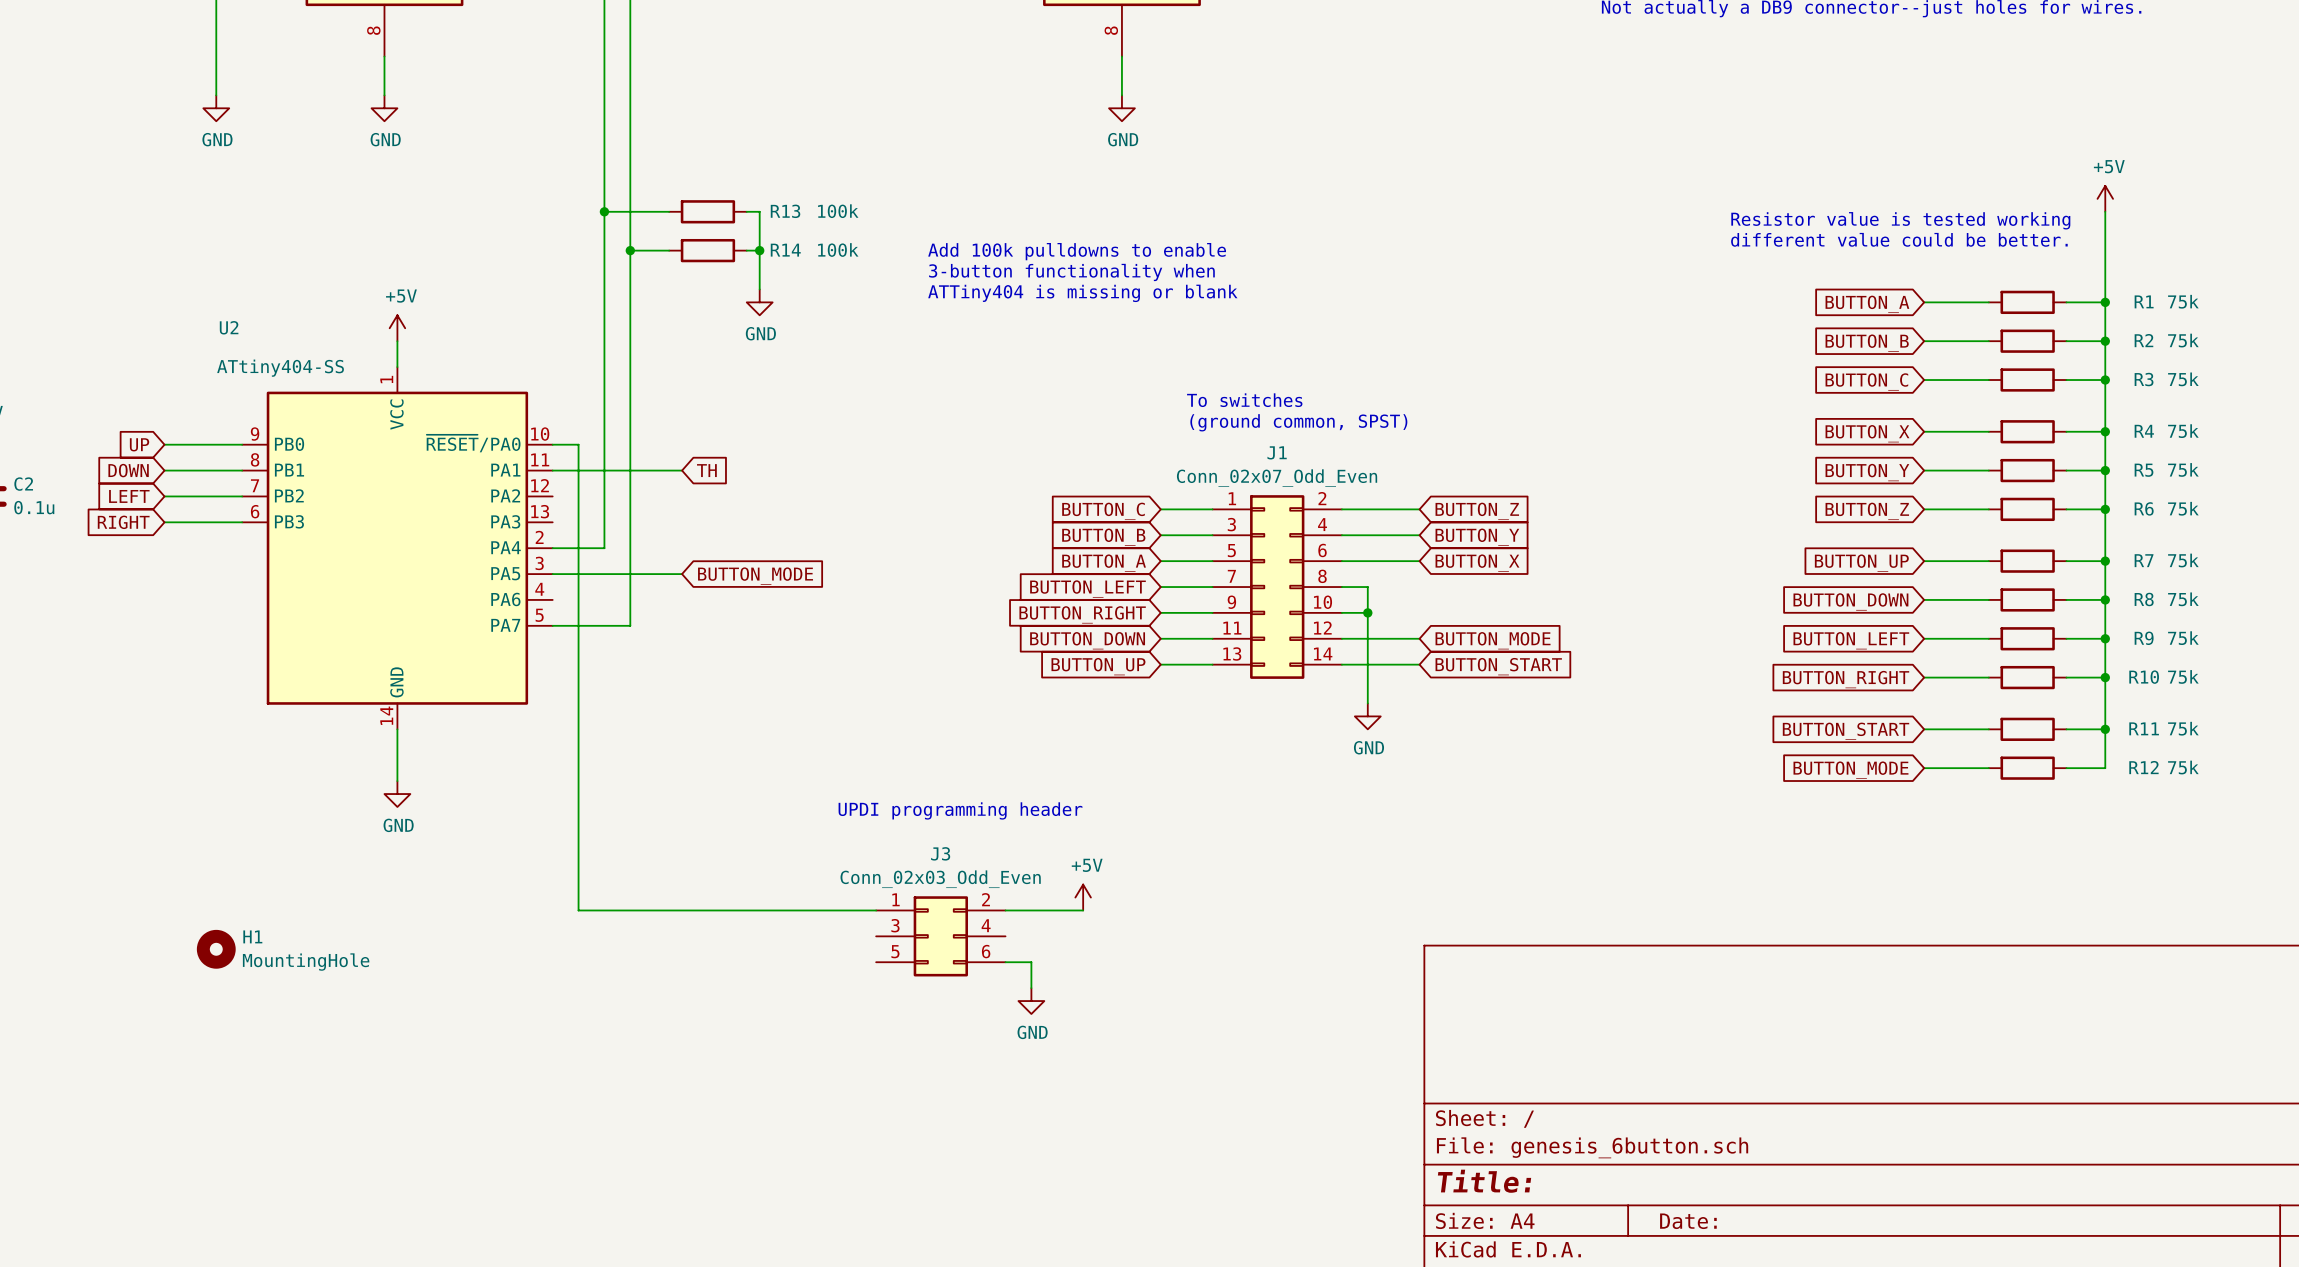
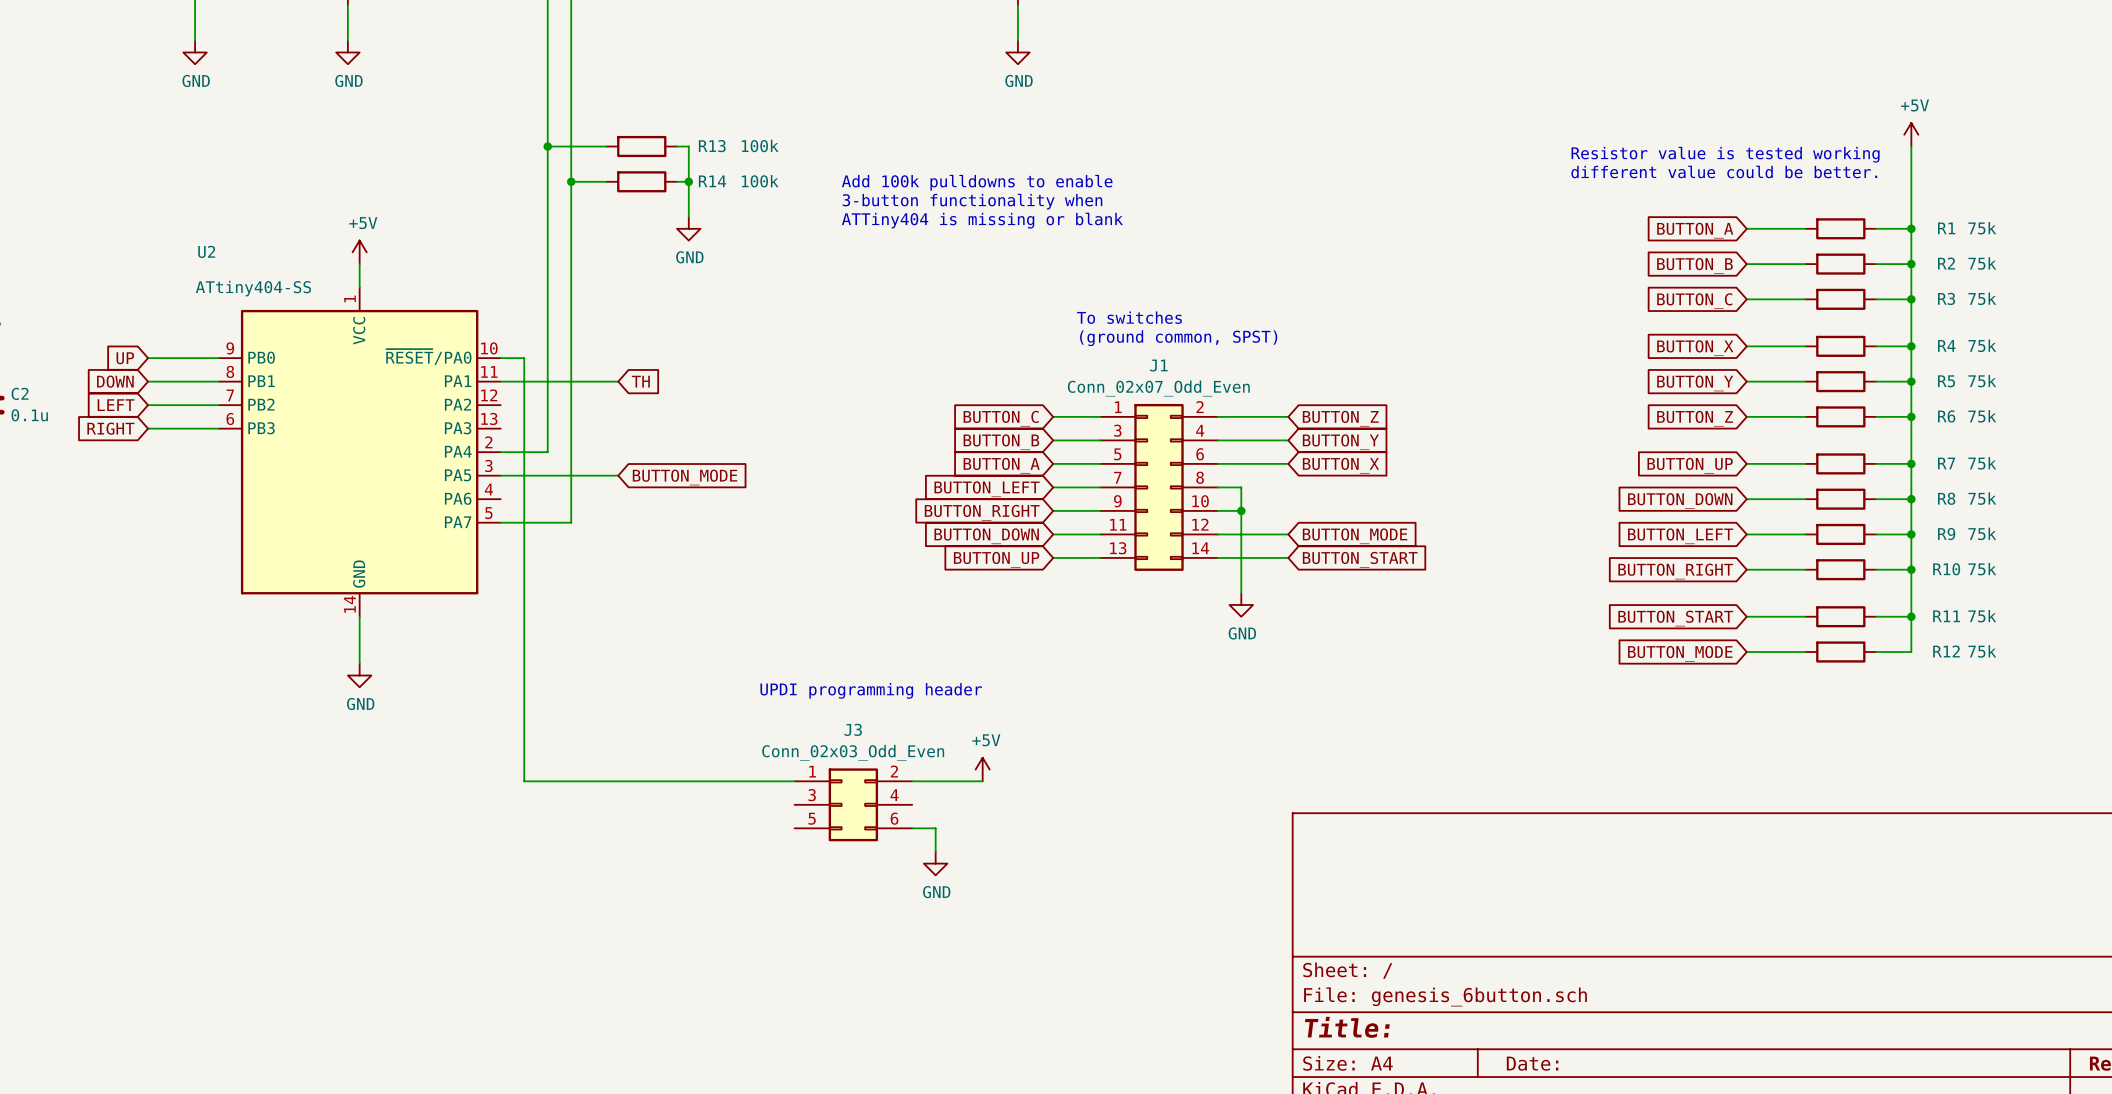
H1: MountingHole (216, 949) -> none

